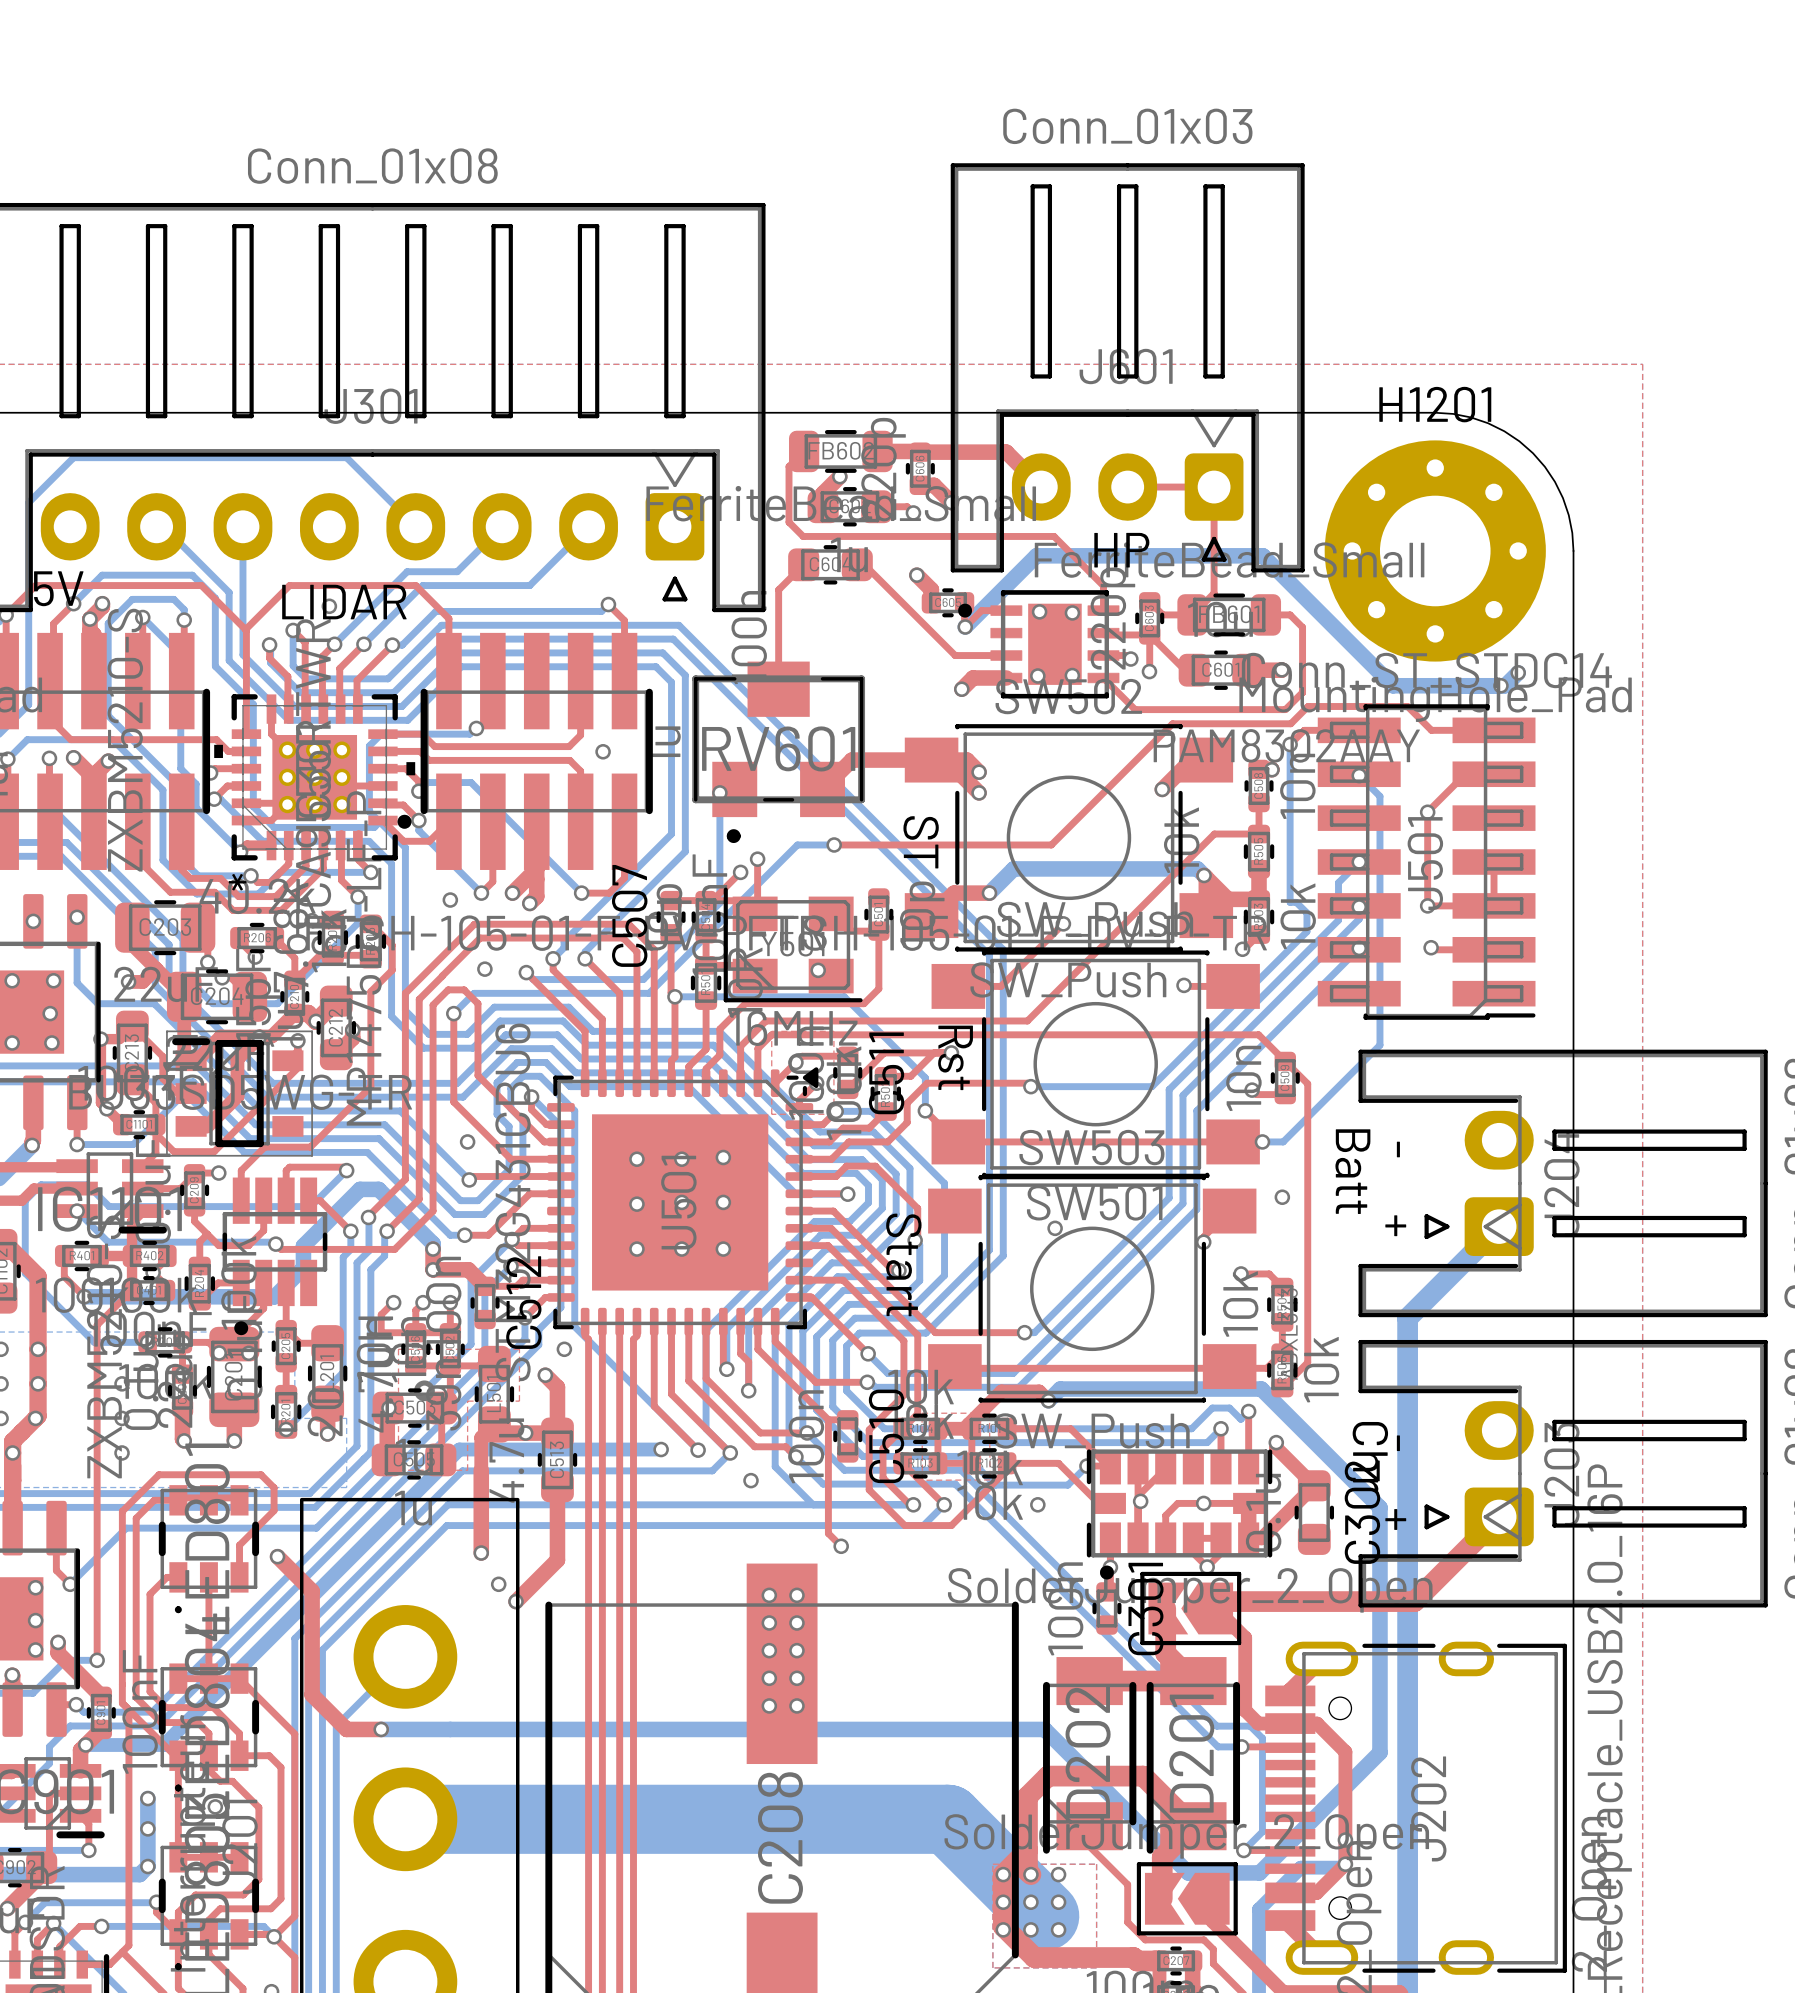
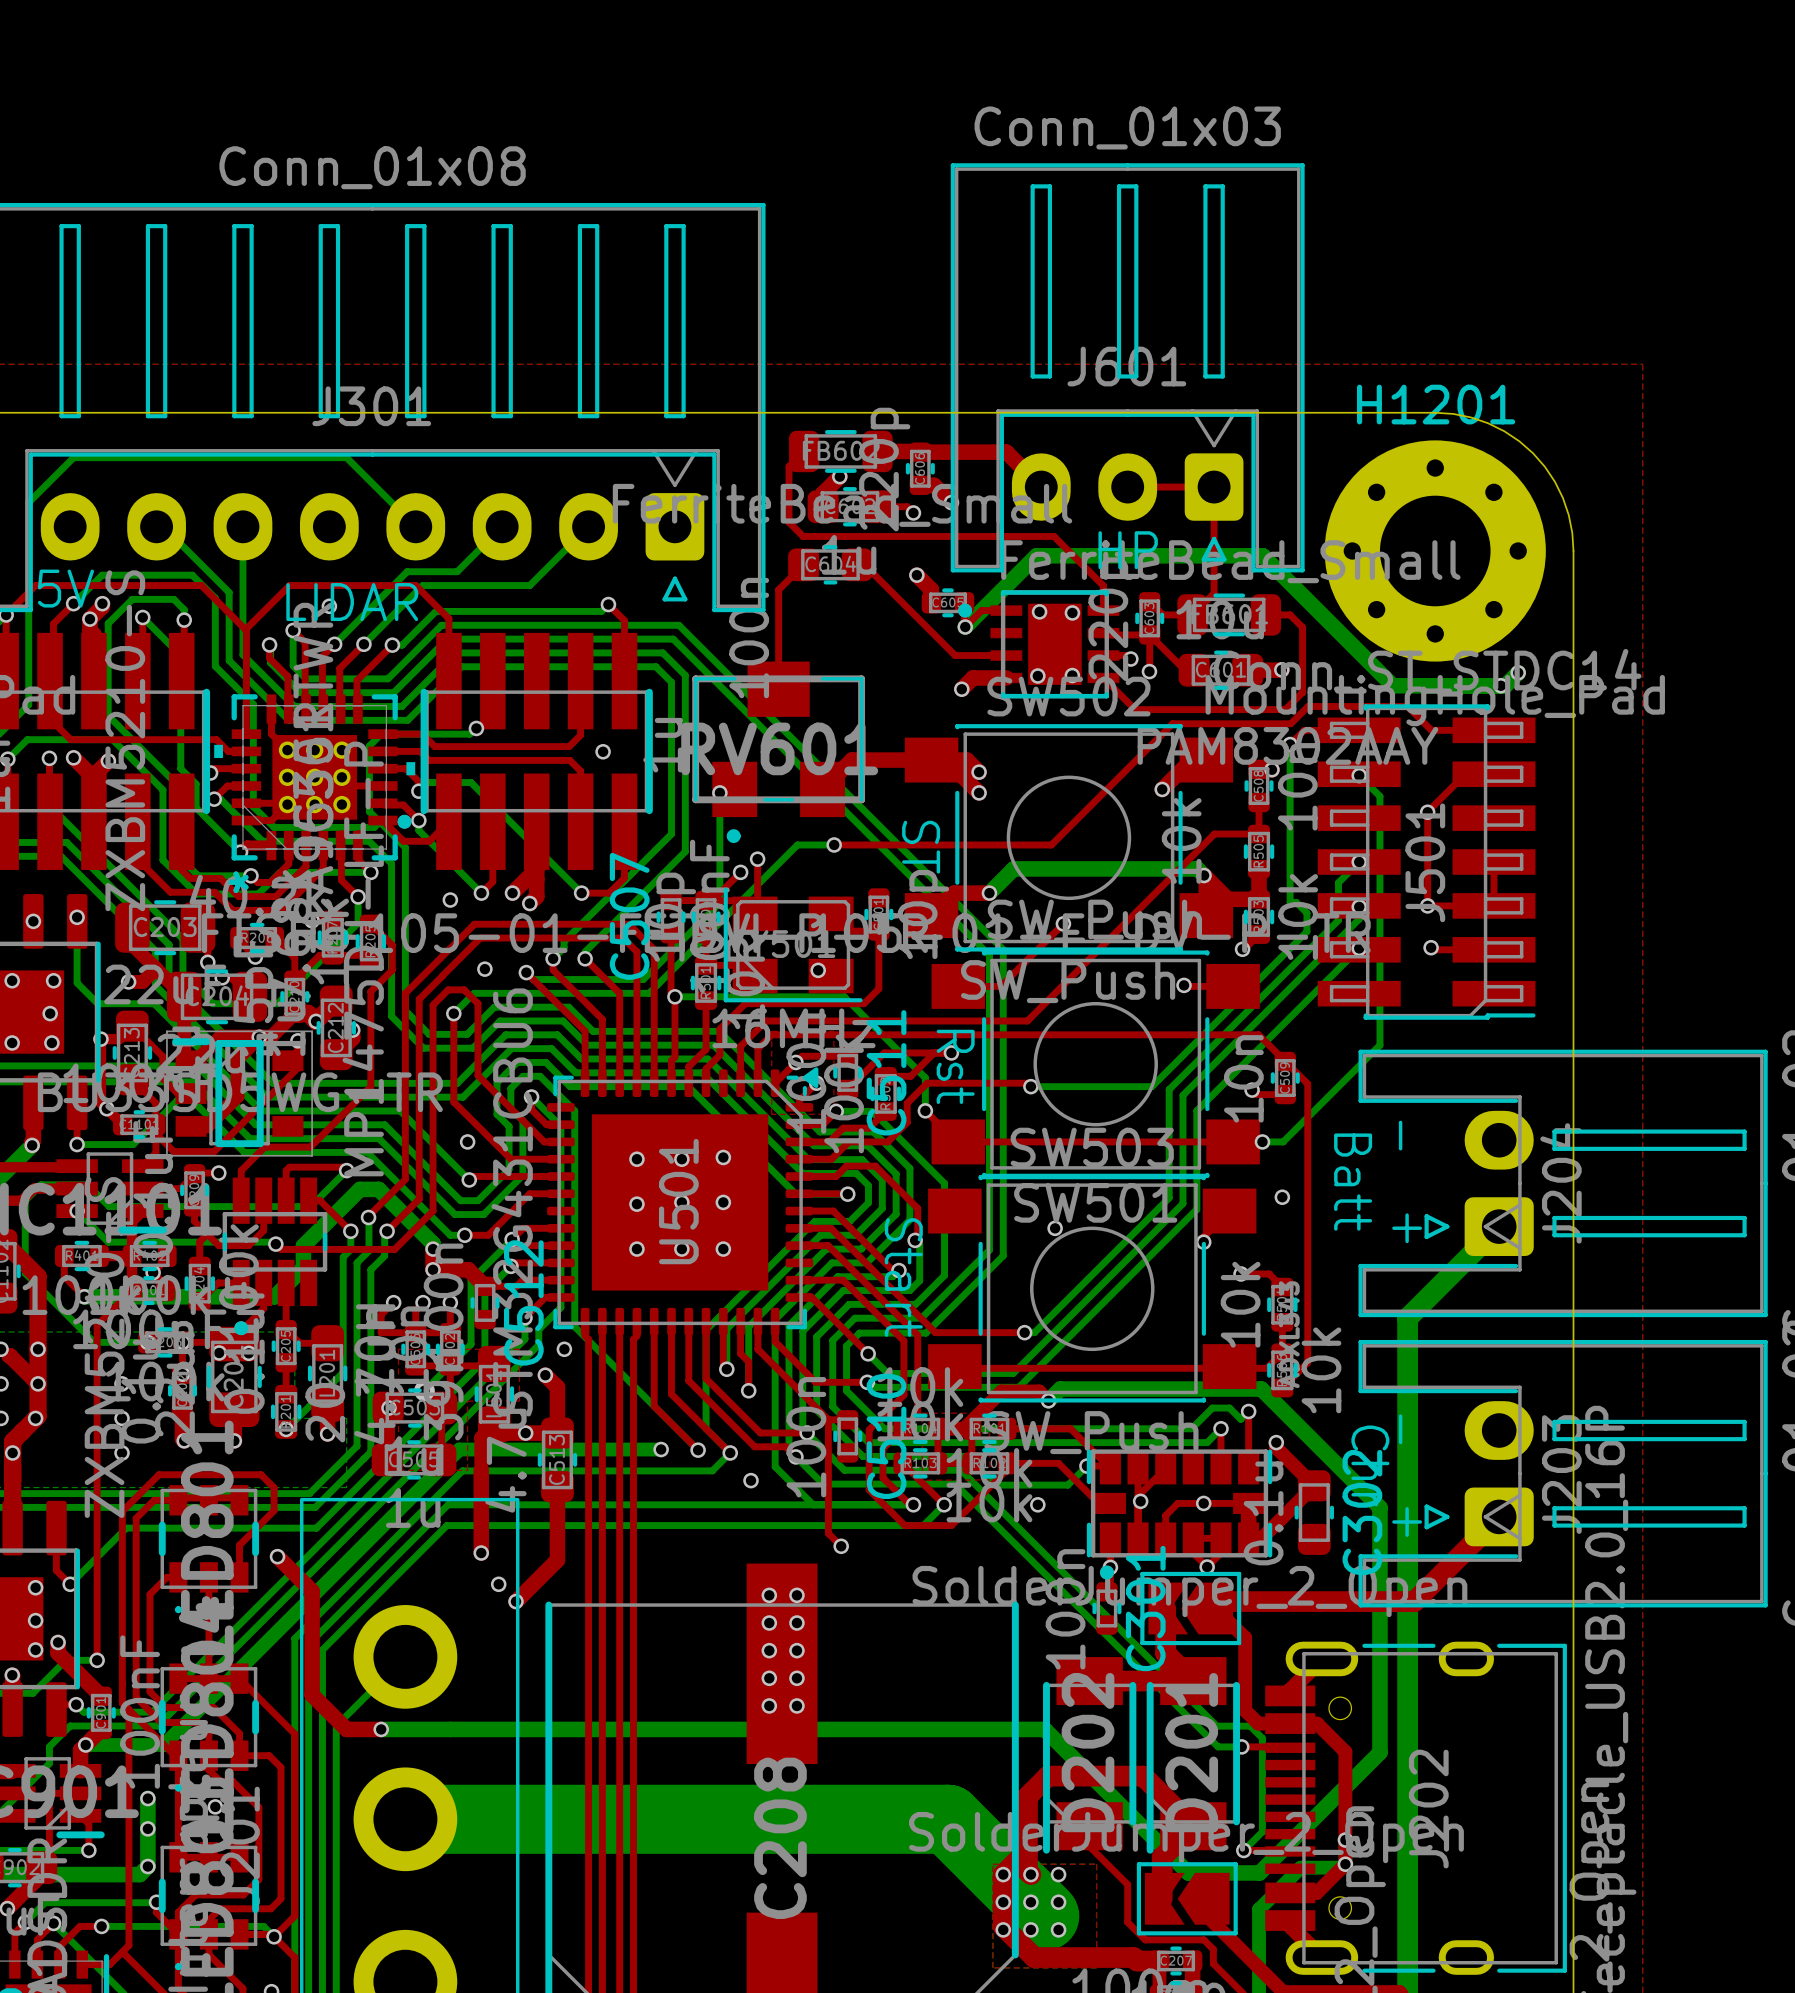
top track: none -> (9, 1355) (38, 1383)

